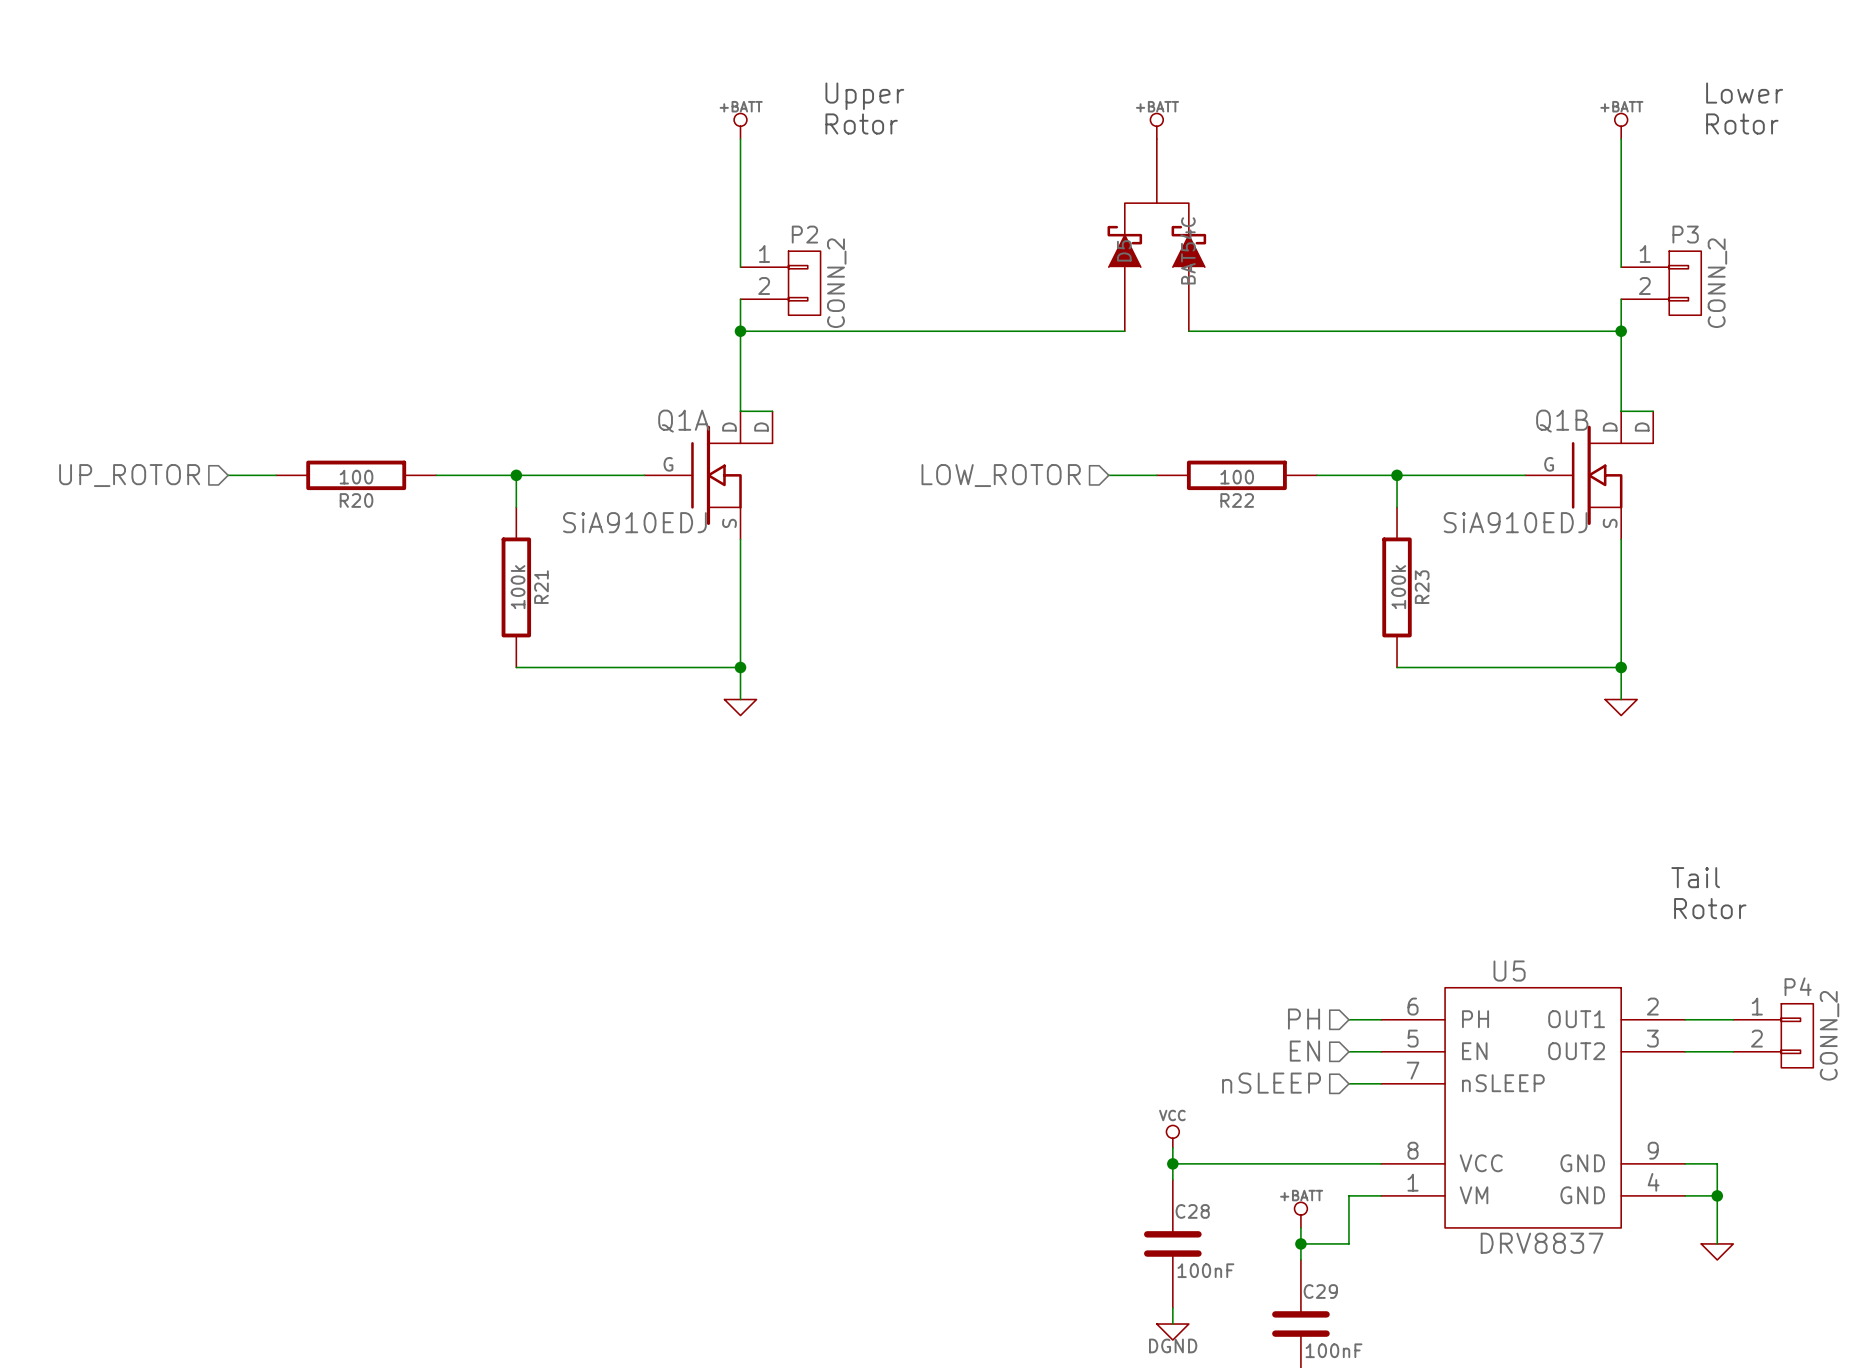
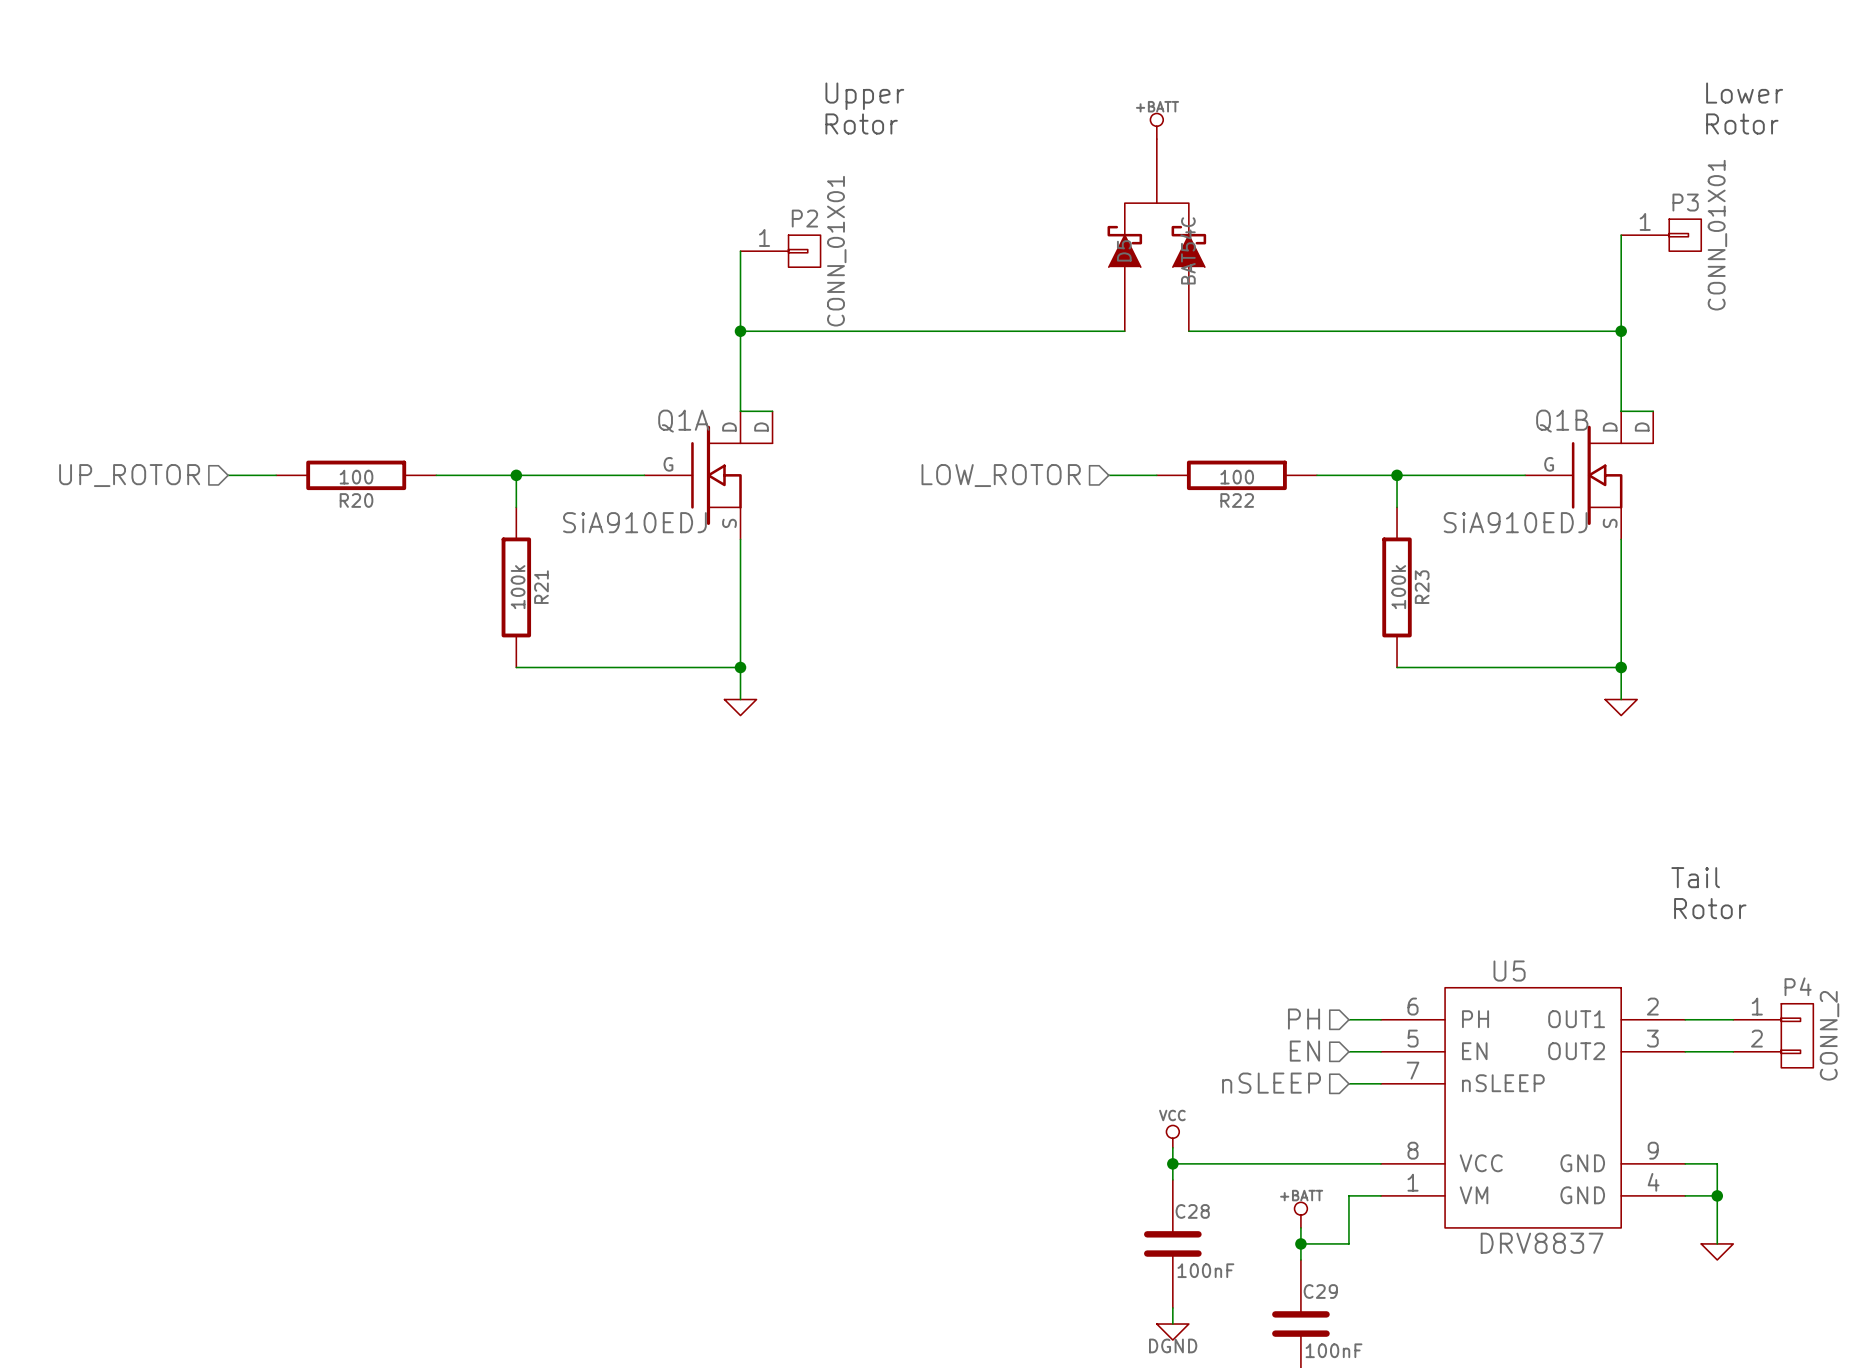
power symbol: +BATT (740, 126) -> none
power symbol: +BATT (1621, 126) -> none
wire: (740, 139) (740, 251) -> none
wire: (1621, 139) (1621, 235) -> none
P2 symbol: [740, 251, 821, 316] -> [740, 235, 821, 268]
P3 symbol: [1621, 251, 1702, 316] -> [1621, 219, 1702, 252]
wire: none -> (740, 267) (740, 299)
wire: none -> (1621, 267) (1621, 299)
P2 value: CONN_2 (836, 283) -> CONN_01X01 (836, 251)
P3 value: CONN_2 (1717, 283) -> CONN_01X01 (1717, 235)

